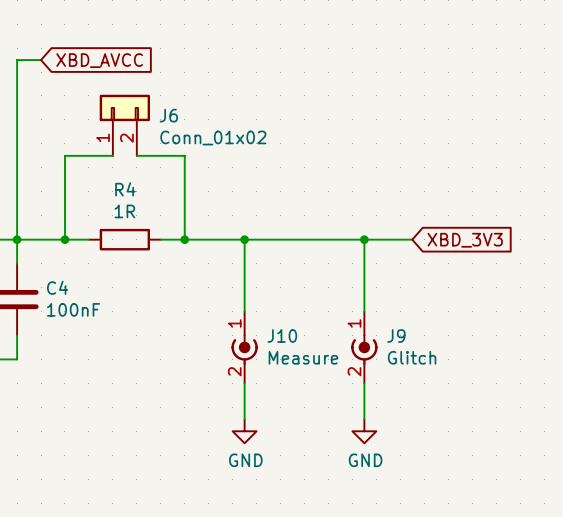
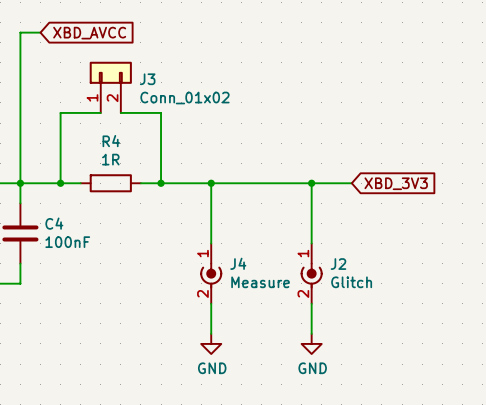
J6 name: J6 (168, 115) -> J3 (147, 79)
J10 name: J10 (282, 335) -> J4 (238, 263)
J9 name: J9 (396, 335) -> J2 (338, 264)

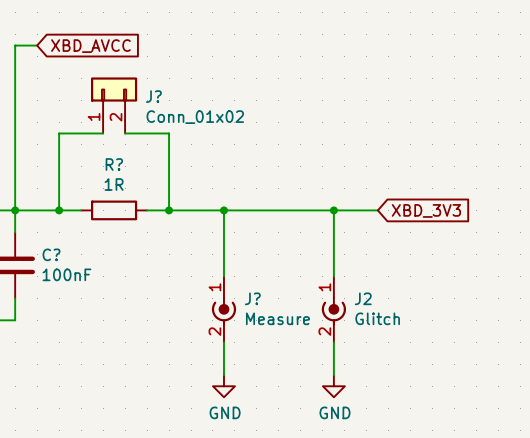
J3 name: J3 (147, 79) -> J? (153, 96)
R4 name: R4 (111, 141) -> R? (114, 164)
C4 name: C4 (54, 223) -> C? (51, 254)
J4 name: J4 (238, 263) -> J? (252, 298)

